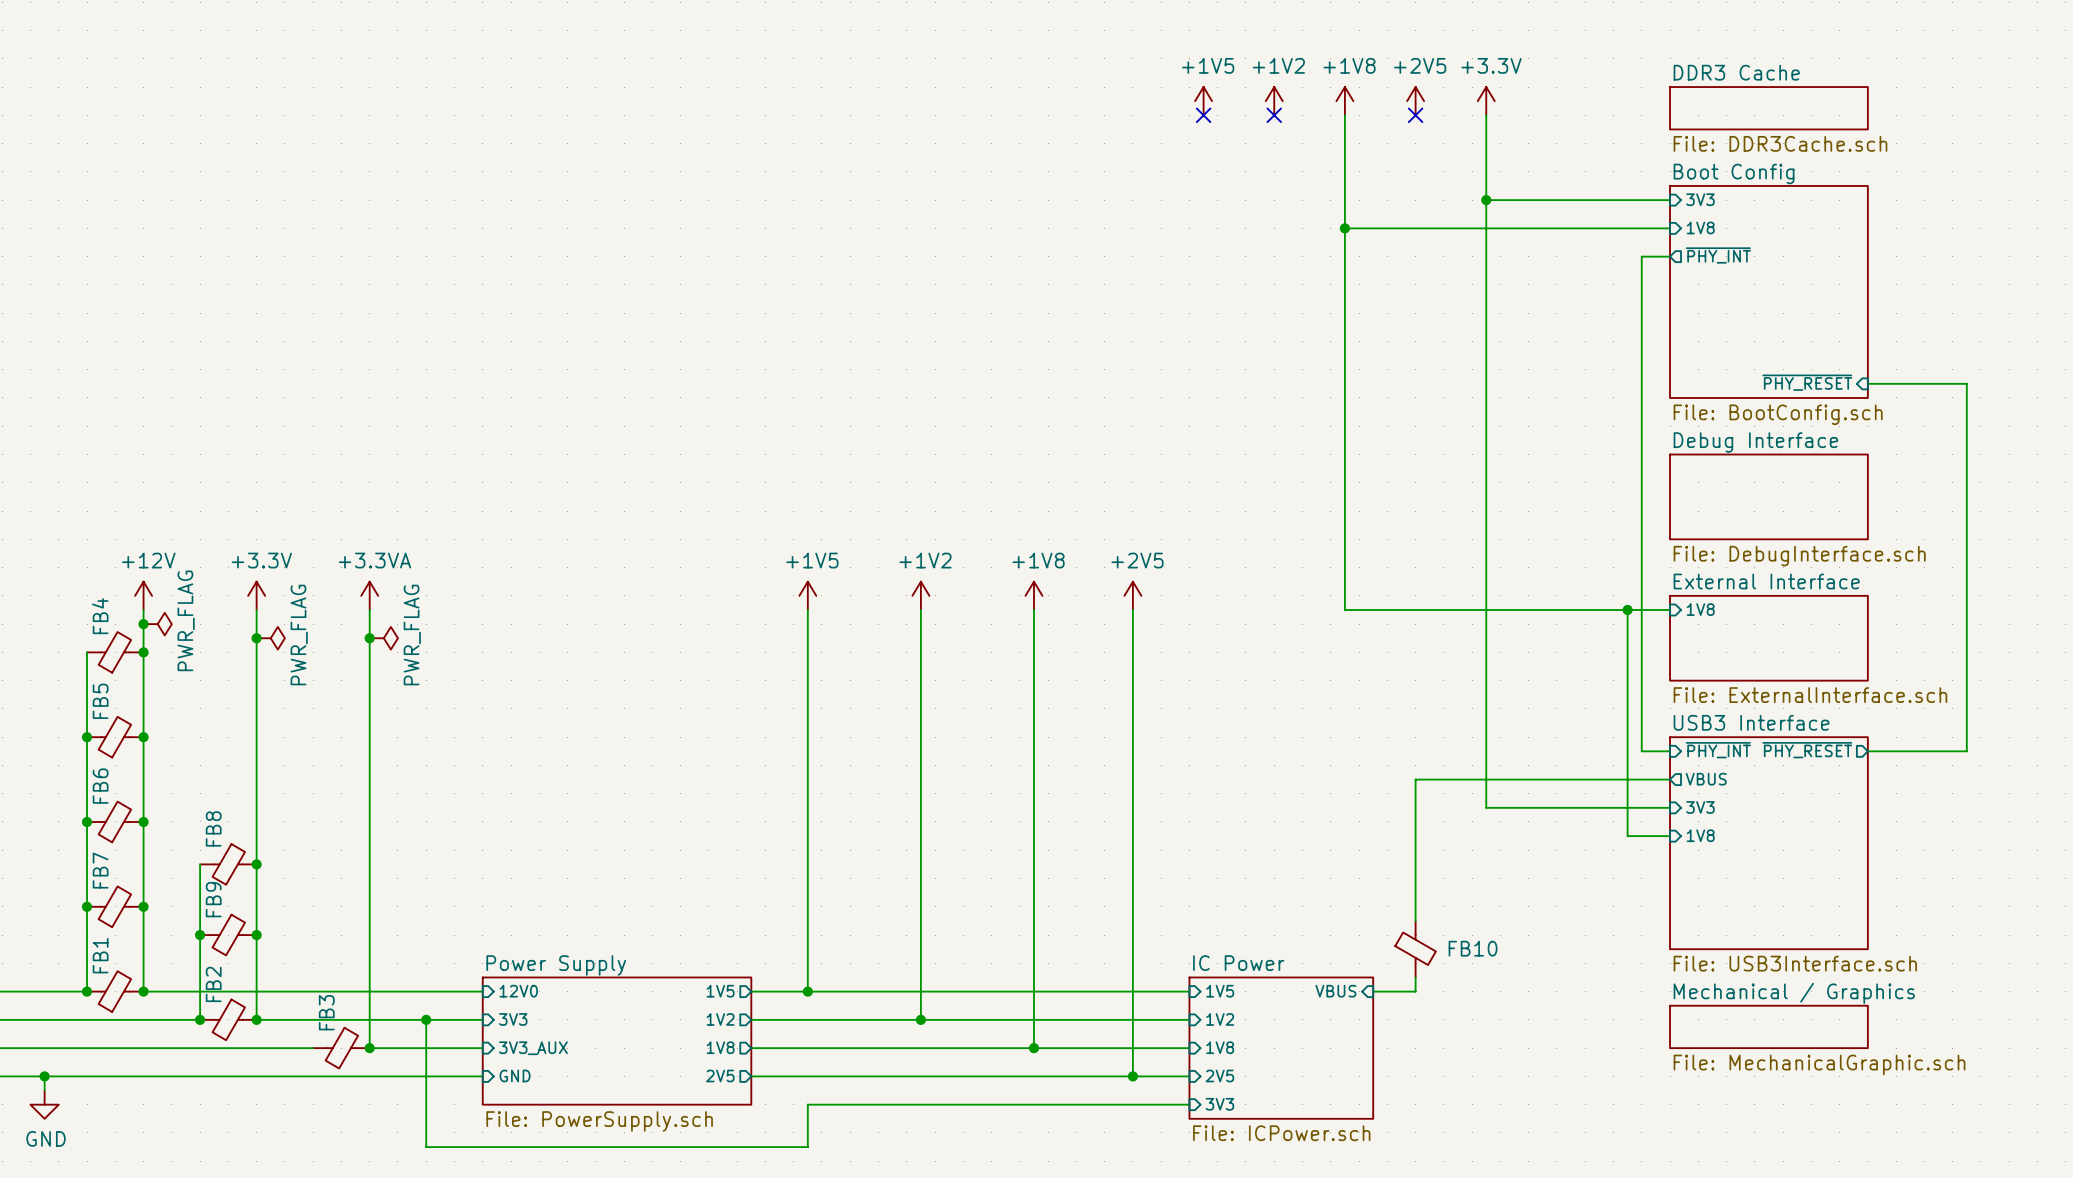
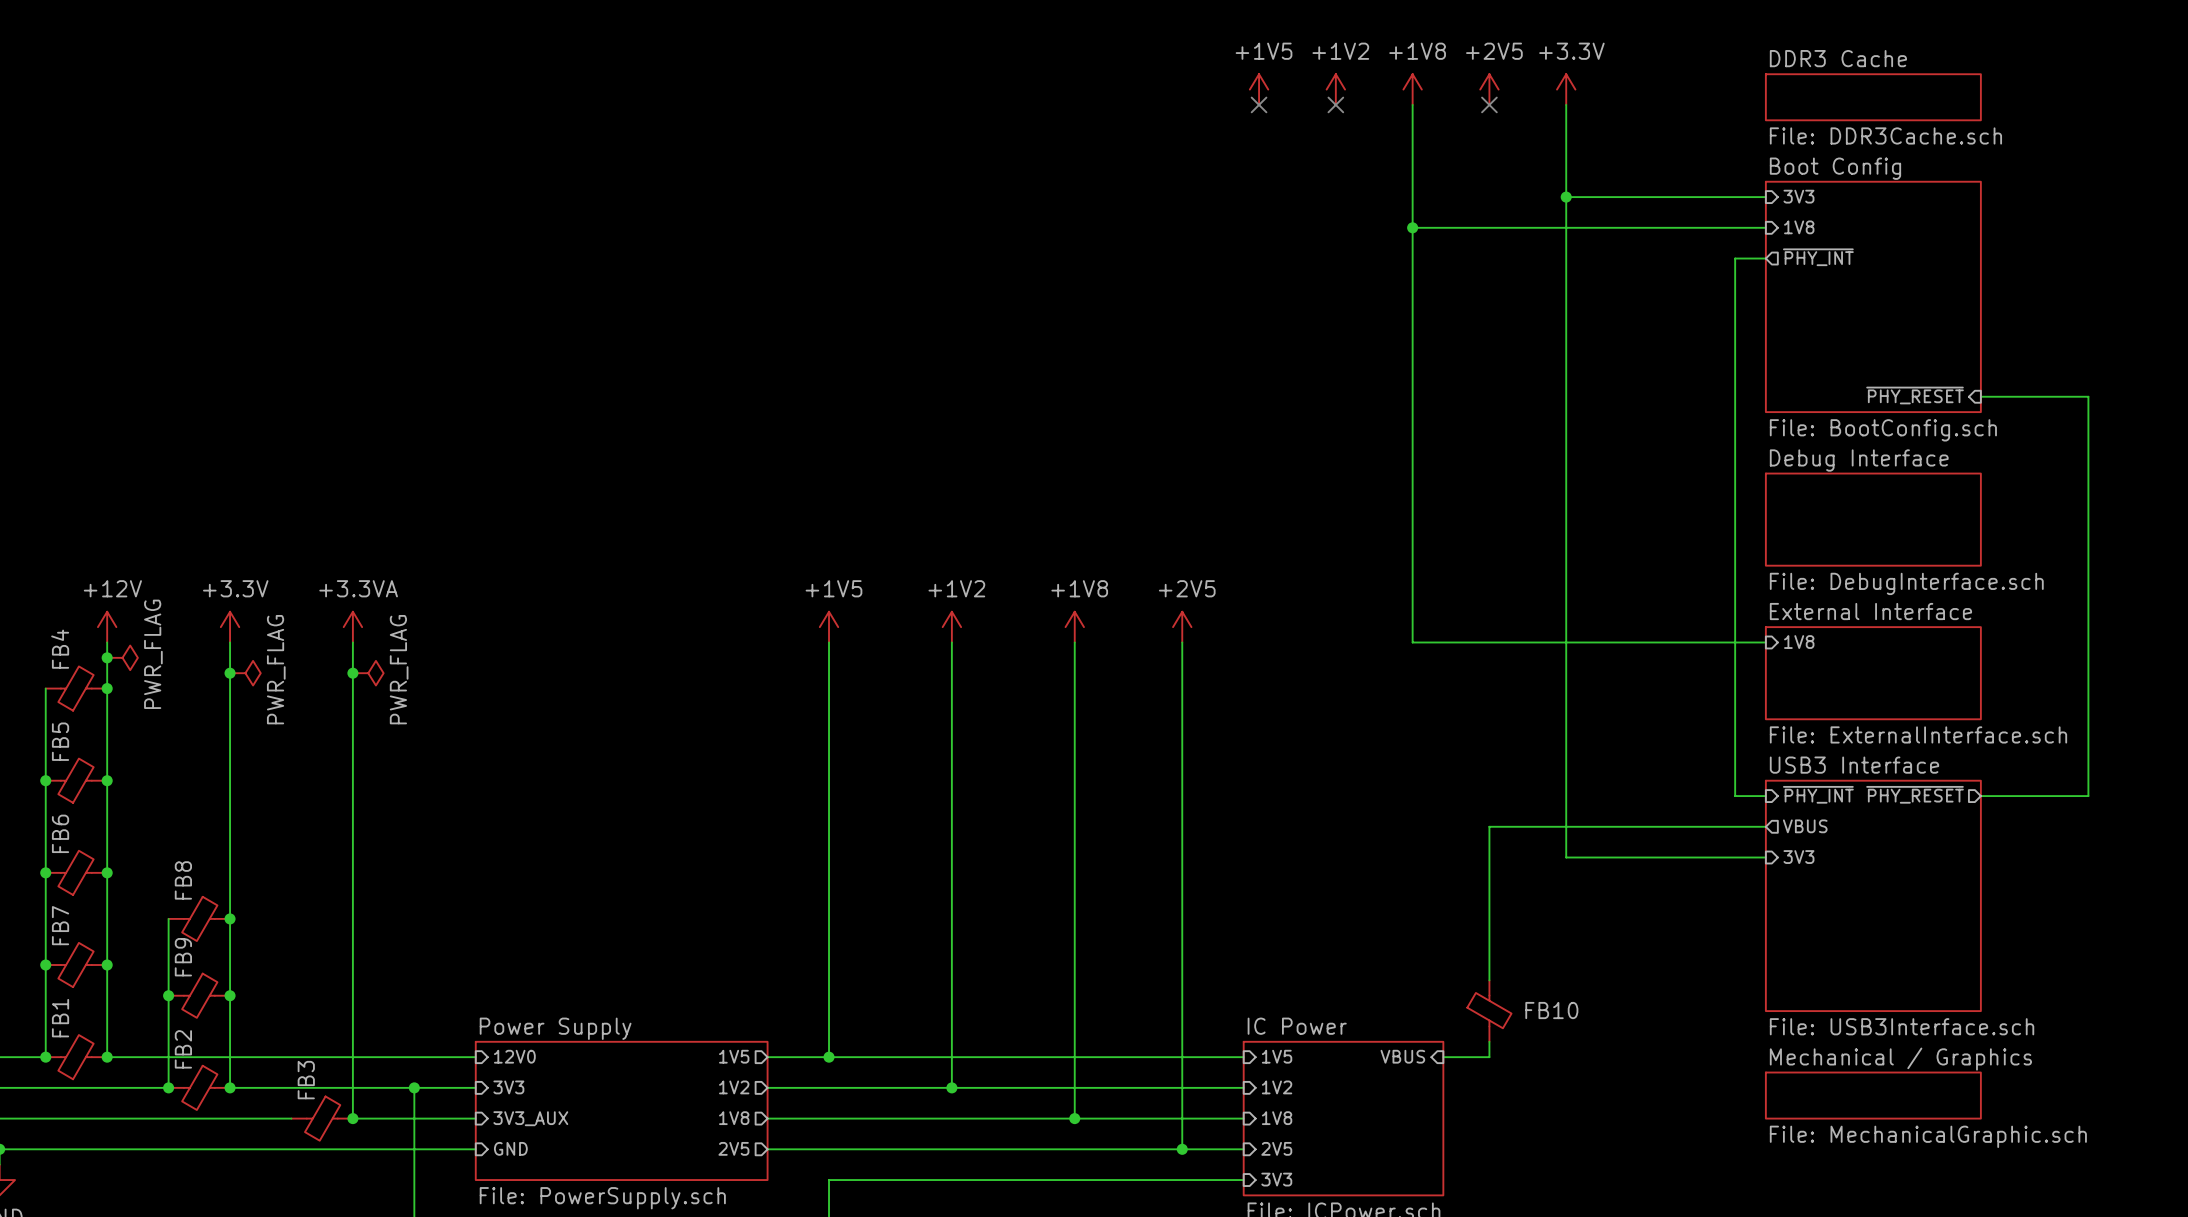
wire: (1627, 609) (1627, 836) (1670, 836) -> none
junction: (1627, 609) -> none
sheet pin: 1V8 (1700, 835) -> none

